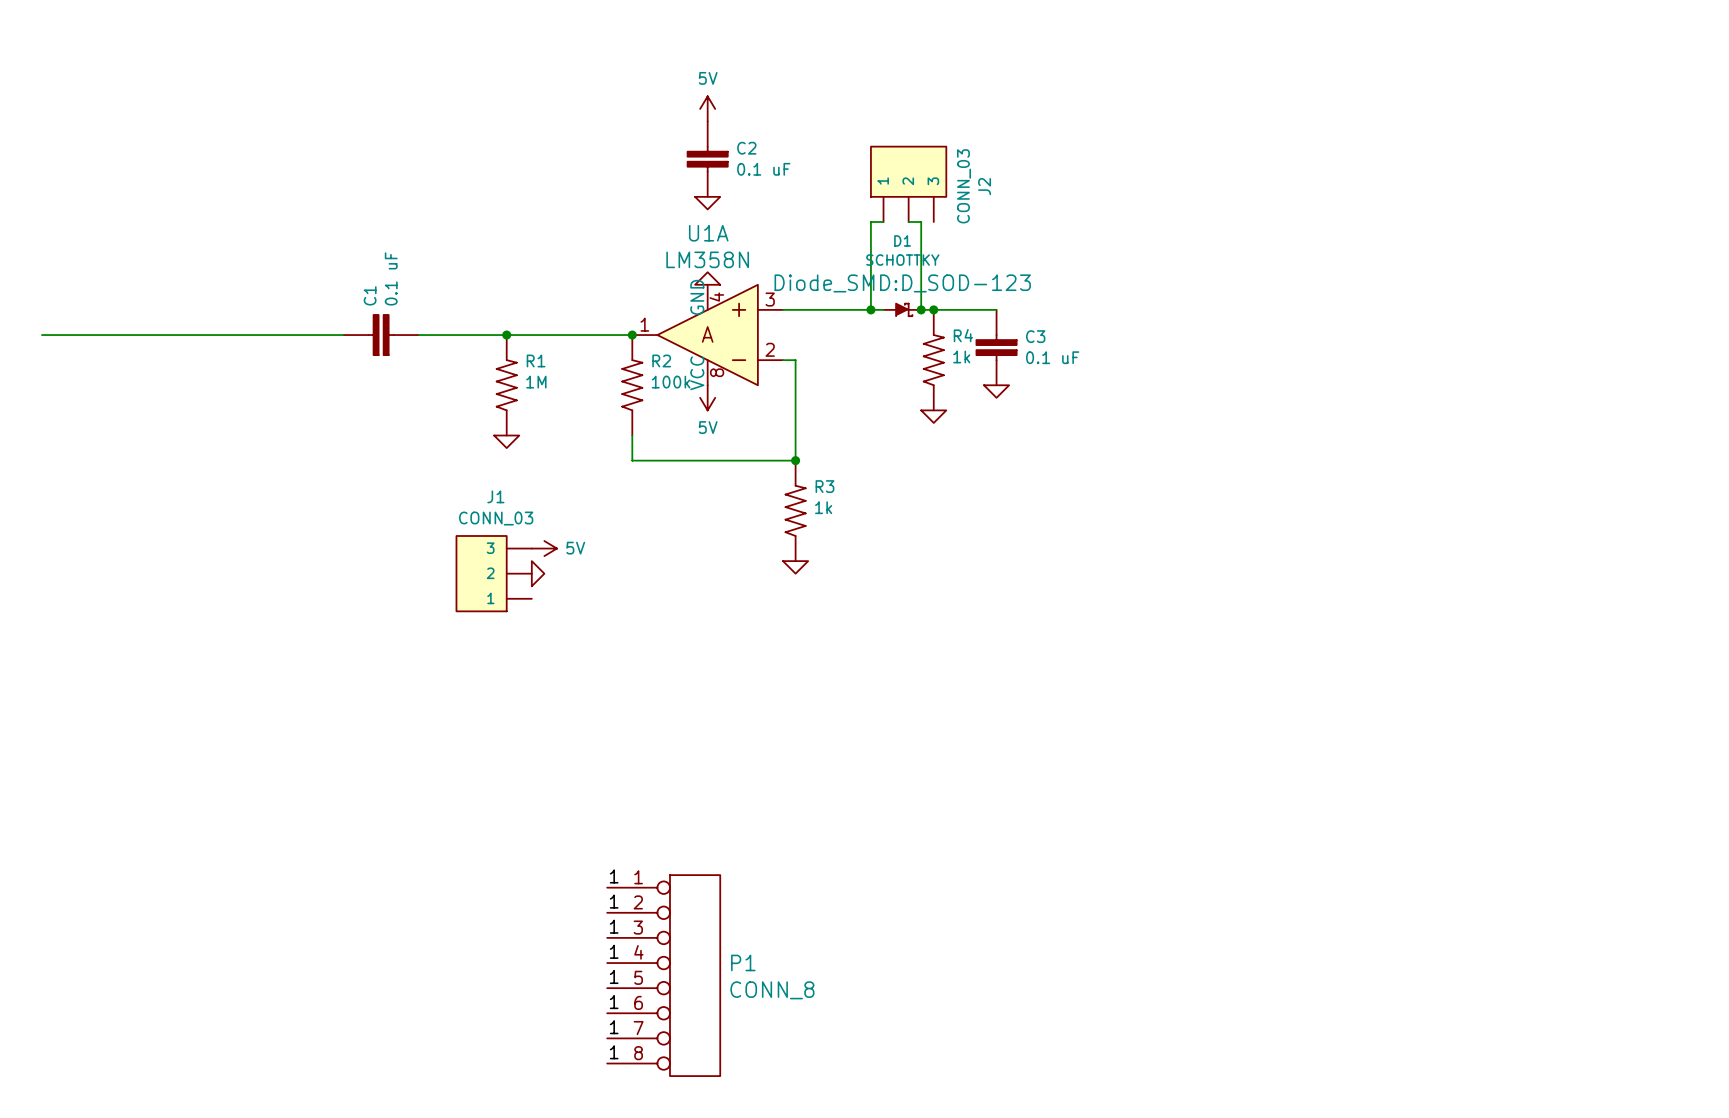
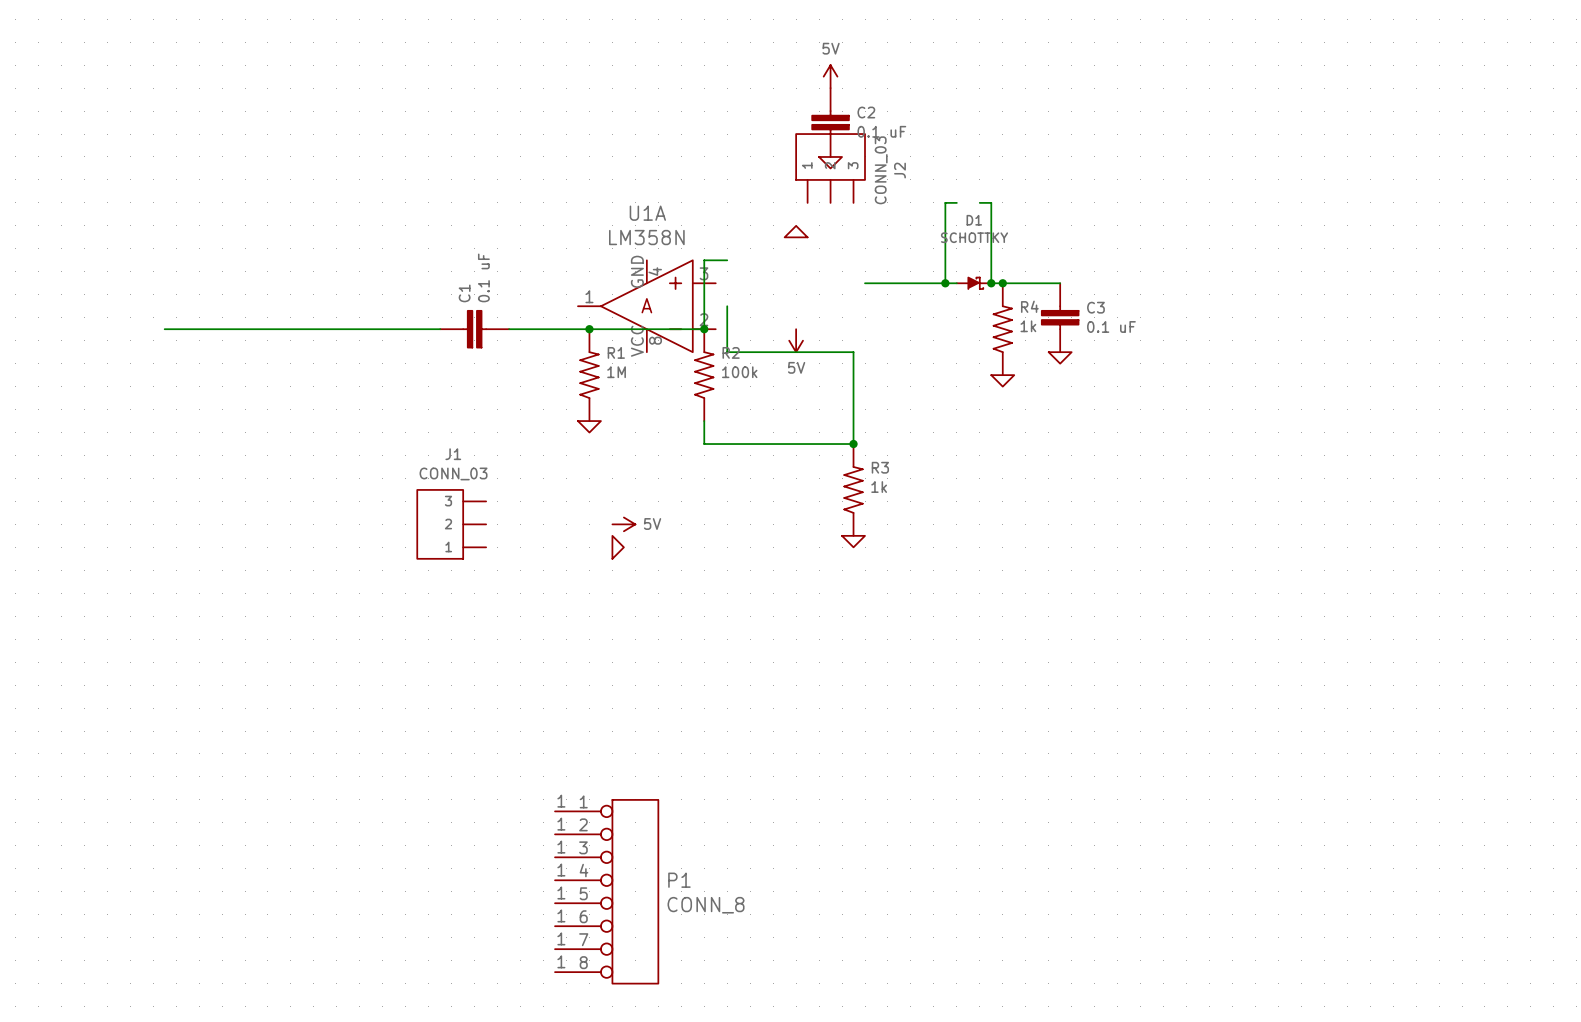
power symbol: none -> 5V (830, 76)
power symbol: 5V (707, 108) -> none
C2 position: (707, 159) -> (830, 122)
power symbol: none -> (830, 162)
power symbol: (707, 203) -> none
wire: (883, 221) (870, 221) (870, 309) -> (956, 202) (945, 202) (945, 283)
wire: (908, 221) (921, 221) (921, 309) (946, 309) -> none
wire: none -> (979, 202) (991, 202) (991, 283) (1060, 283)
power symbol: none -> (796, 231)
power symbol: (707, 278) -> none
D1 text: Diode_SMD:D_SOD-123 (902, 283) -> none
wire: none -> (727, 260) (704, 260) (704, 329) (509, 329)
wire: (783, 309) (883, 309) -> none
junction: (870, 309) -> none
D1 position: (902, 309) -> (974, 283)
junction: (921, 309) -> none
junction: (933, 309) -> none
wire: none -> (910, 283) (956, 283)
junction: none -> (945, 283)
junction: none -> (991, 283)
junction: none -> (1002, 283)
wire: (41, 335) (343, 335) -> (164, 329) (440, 329)
C1 position: (381, 335) -> (474, 329)
wire: (418, 335) (632, 335) -> none
junction: (506, 335) -> none
junction position: (632, 335) -> (589, 329)
C3 position: (996, 347) -> (1060, 317)
junction: none -> (704, 329)
wire: (783, 360) (795, 360) -> (727, 306) (727, 329)
R4 position: (933, 360) -> (1002, 329)
power symbol: none -> 5V (796, 340)
R1 position: (506, 385) -> (589, 375)
R2 position: (632, 385) -> (704, 375)
wire: (795, 385) (795, 460) (632, 460) (632, 435) -> (727, 352) (853, 352) (853, 444) (704, 444) (704, 421)
power symbol: (996, 391) -> none
power symbol: none -> (1060, 357)
power symbol: 5V (707, 397) -> none
power symbol: (933, 416) -> none
power symbol: none -> (1002, 380)
power symbol: (506, 441) -> none
junction: (795, 460) -> none
power symbol: none -> (589, 426)
junction: none -> (853, 444)
R3 position: (795, 510) -> (853, 489)
power symbol: 5V (544, 548) -> none
power symbol: (795, 567) -> none
power symbol: (538, 573) -> none
power symbol: none -> 5V (623, 524)
power symbol: none -> (853, 541)
power symbol: none -> (618, 547)

